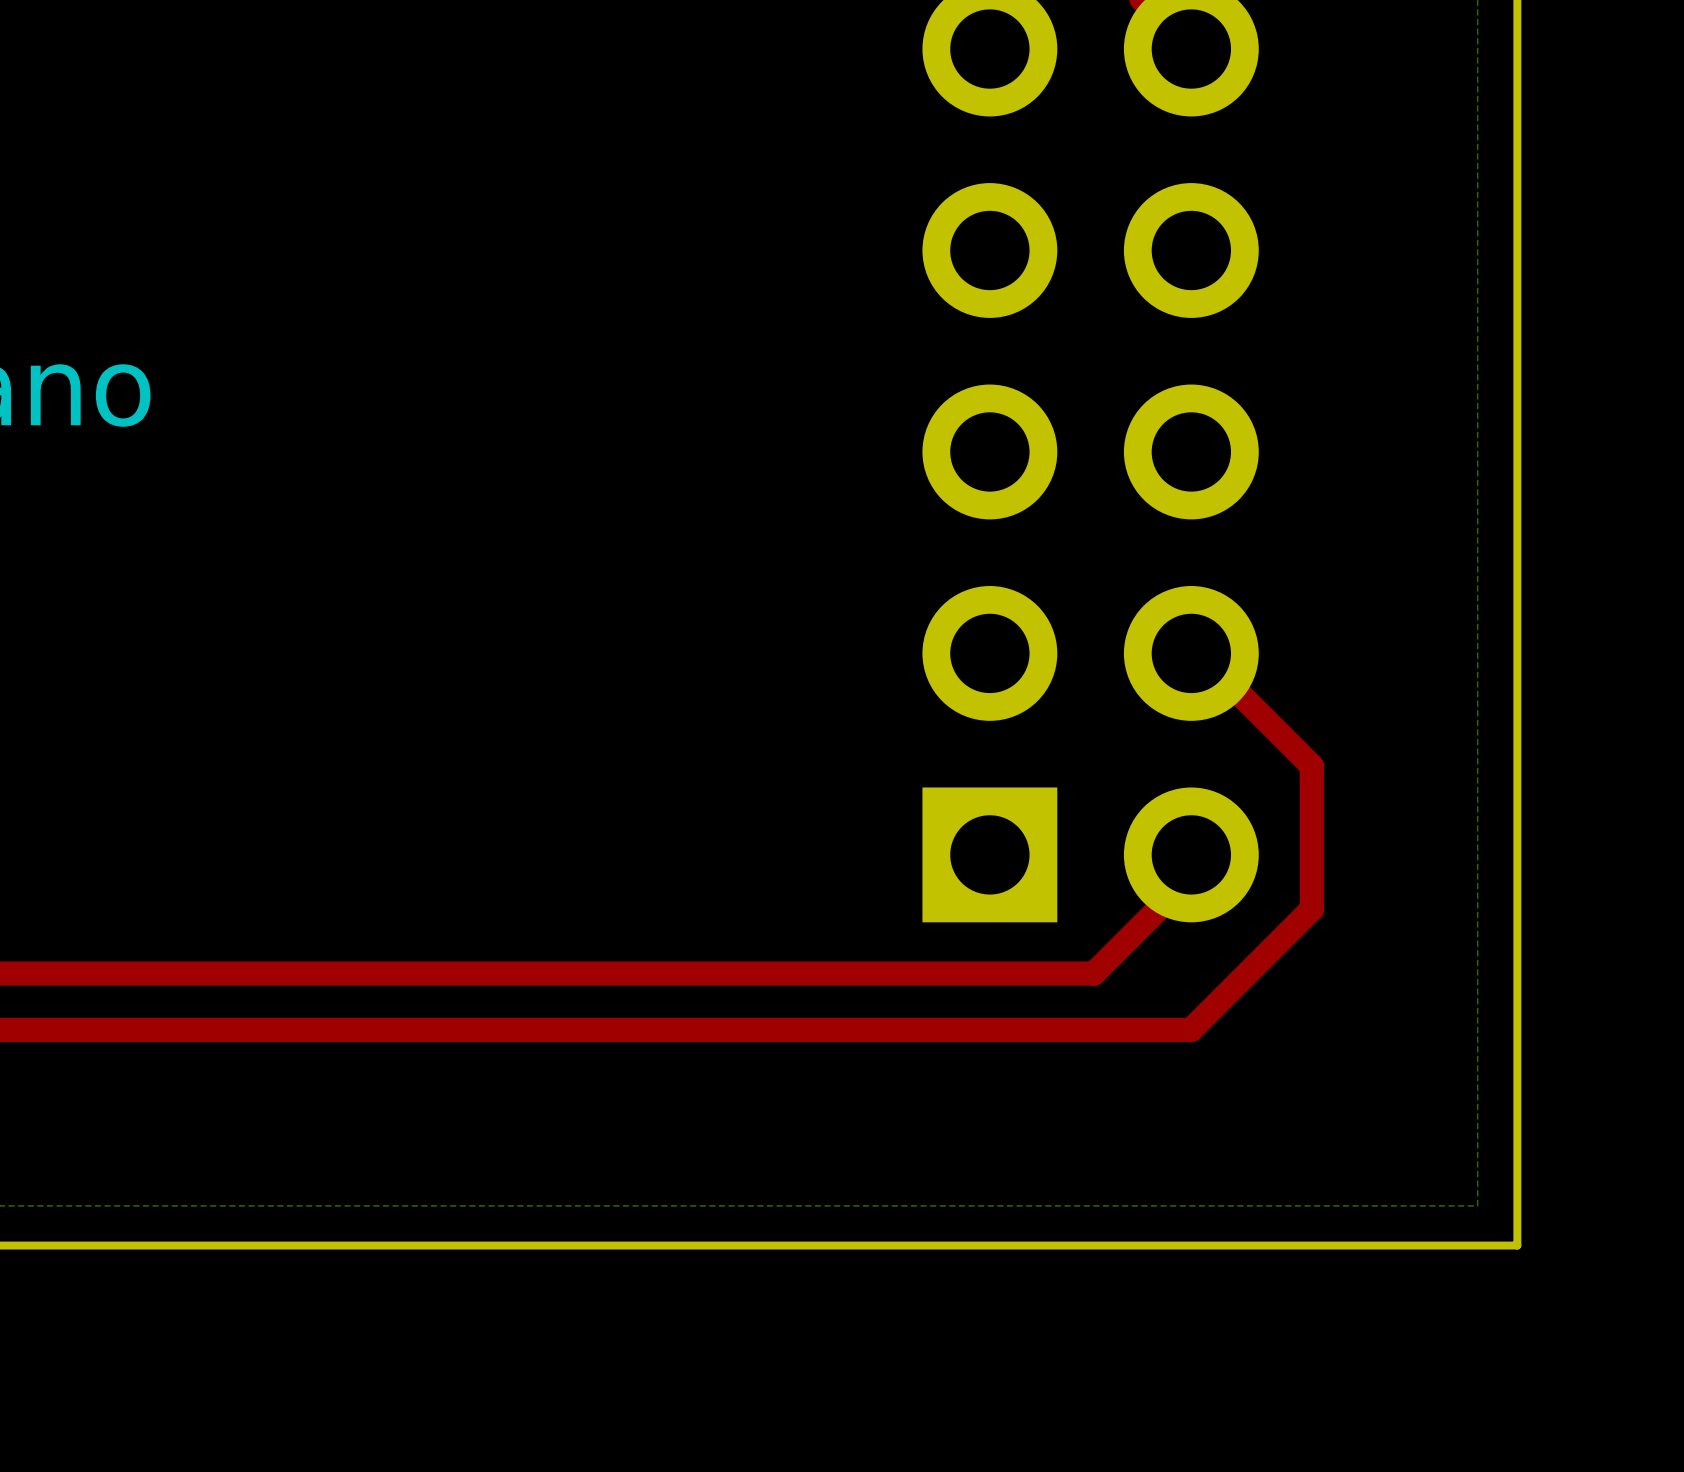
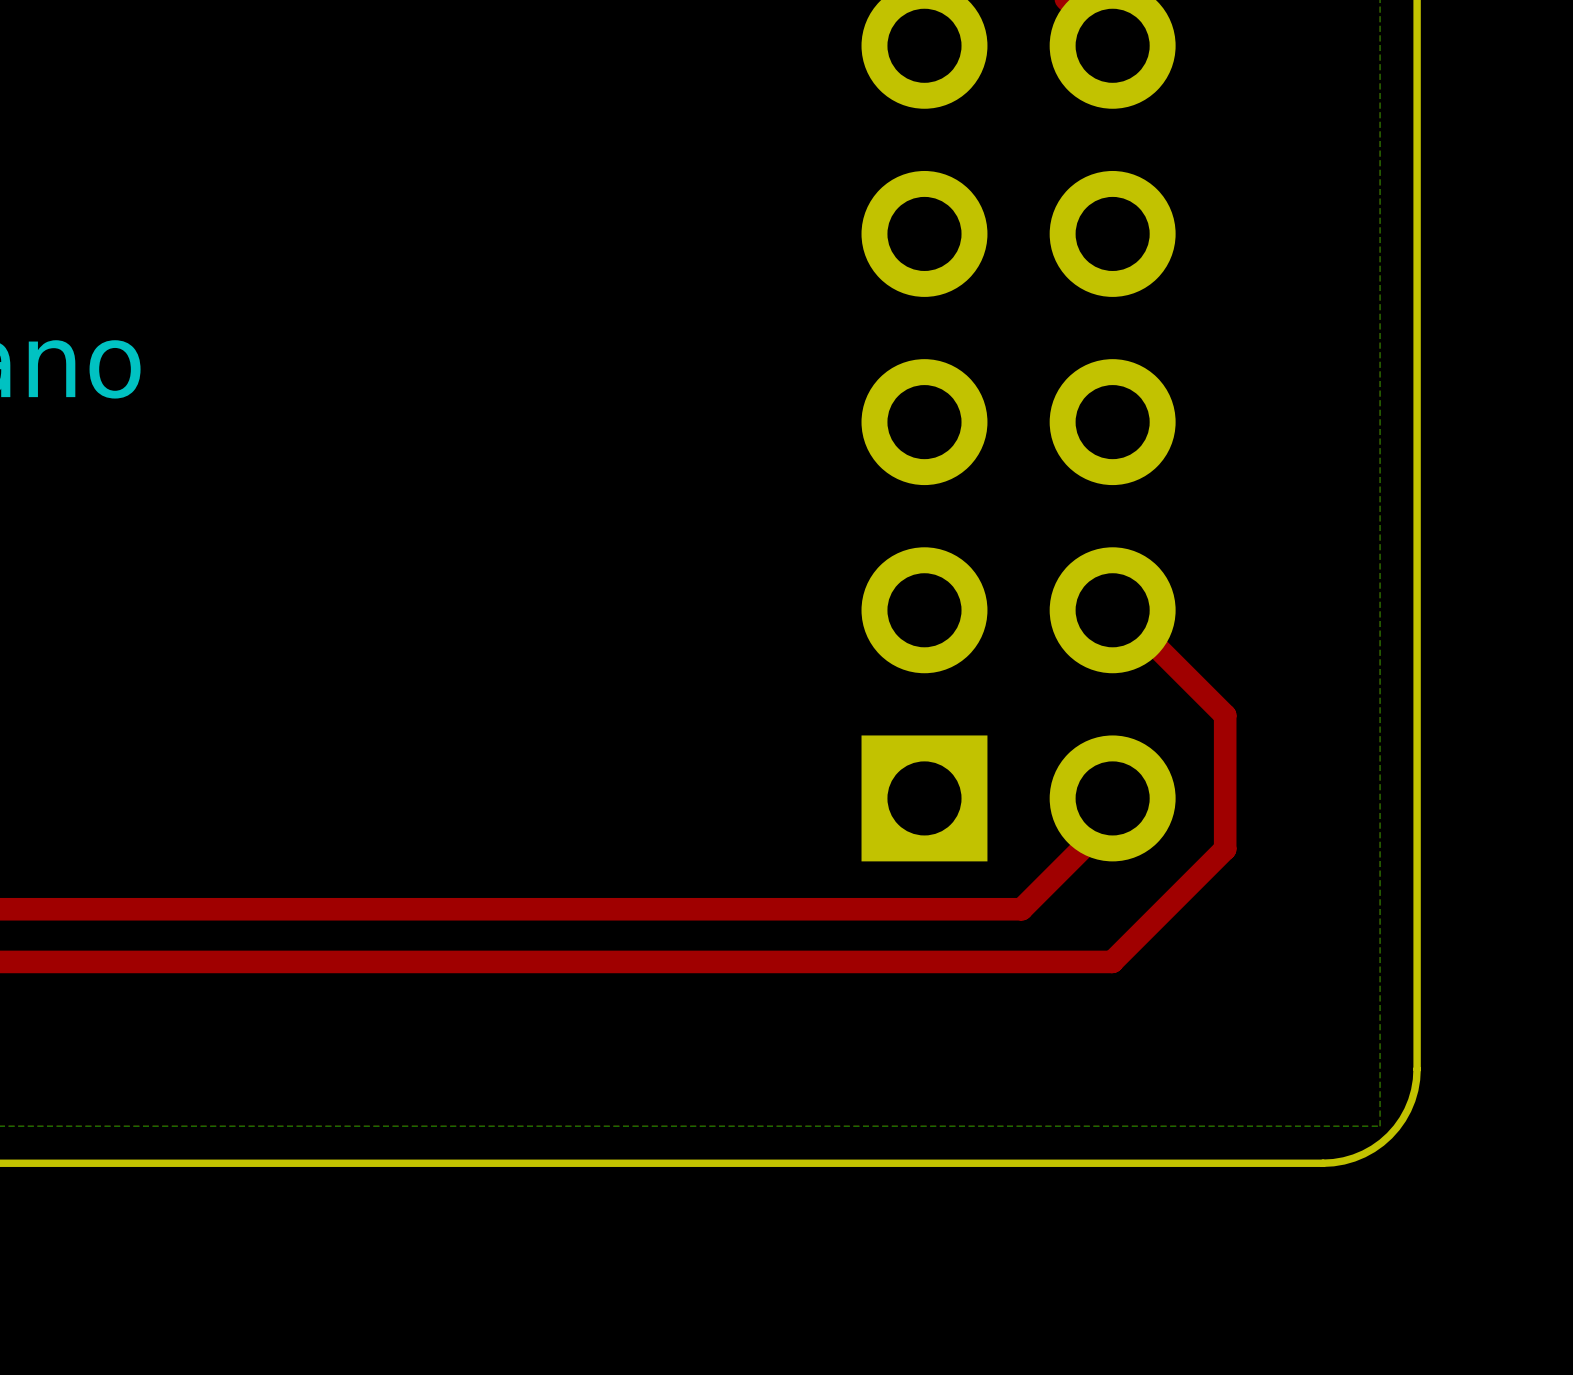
board edge: (1517, 1144) (1517, 1245) (1416, 1245) -> (1417, 1069) (1414, 1090) (1407, 1110) (1389, 1135) (1373, 1148) (1354, 1157) (1323, 1163)

